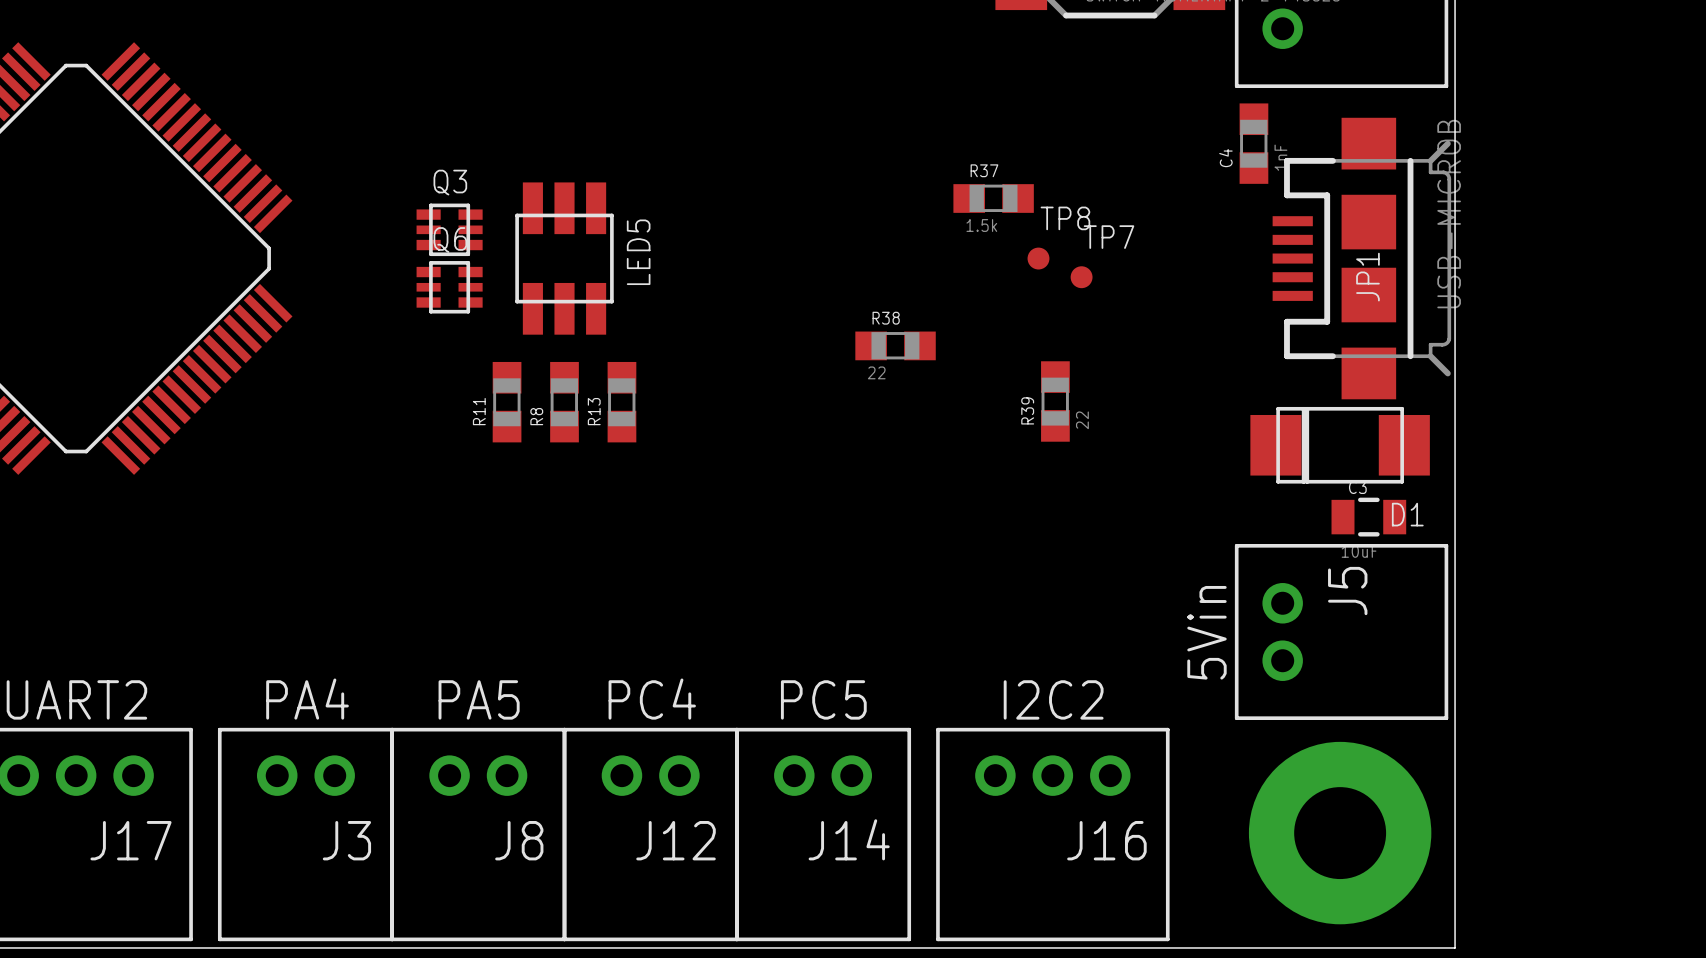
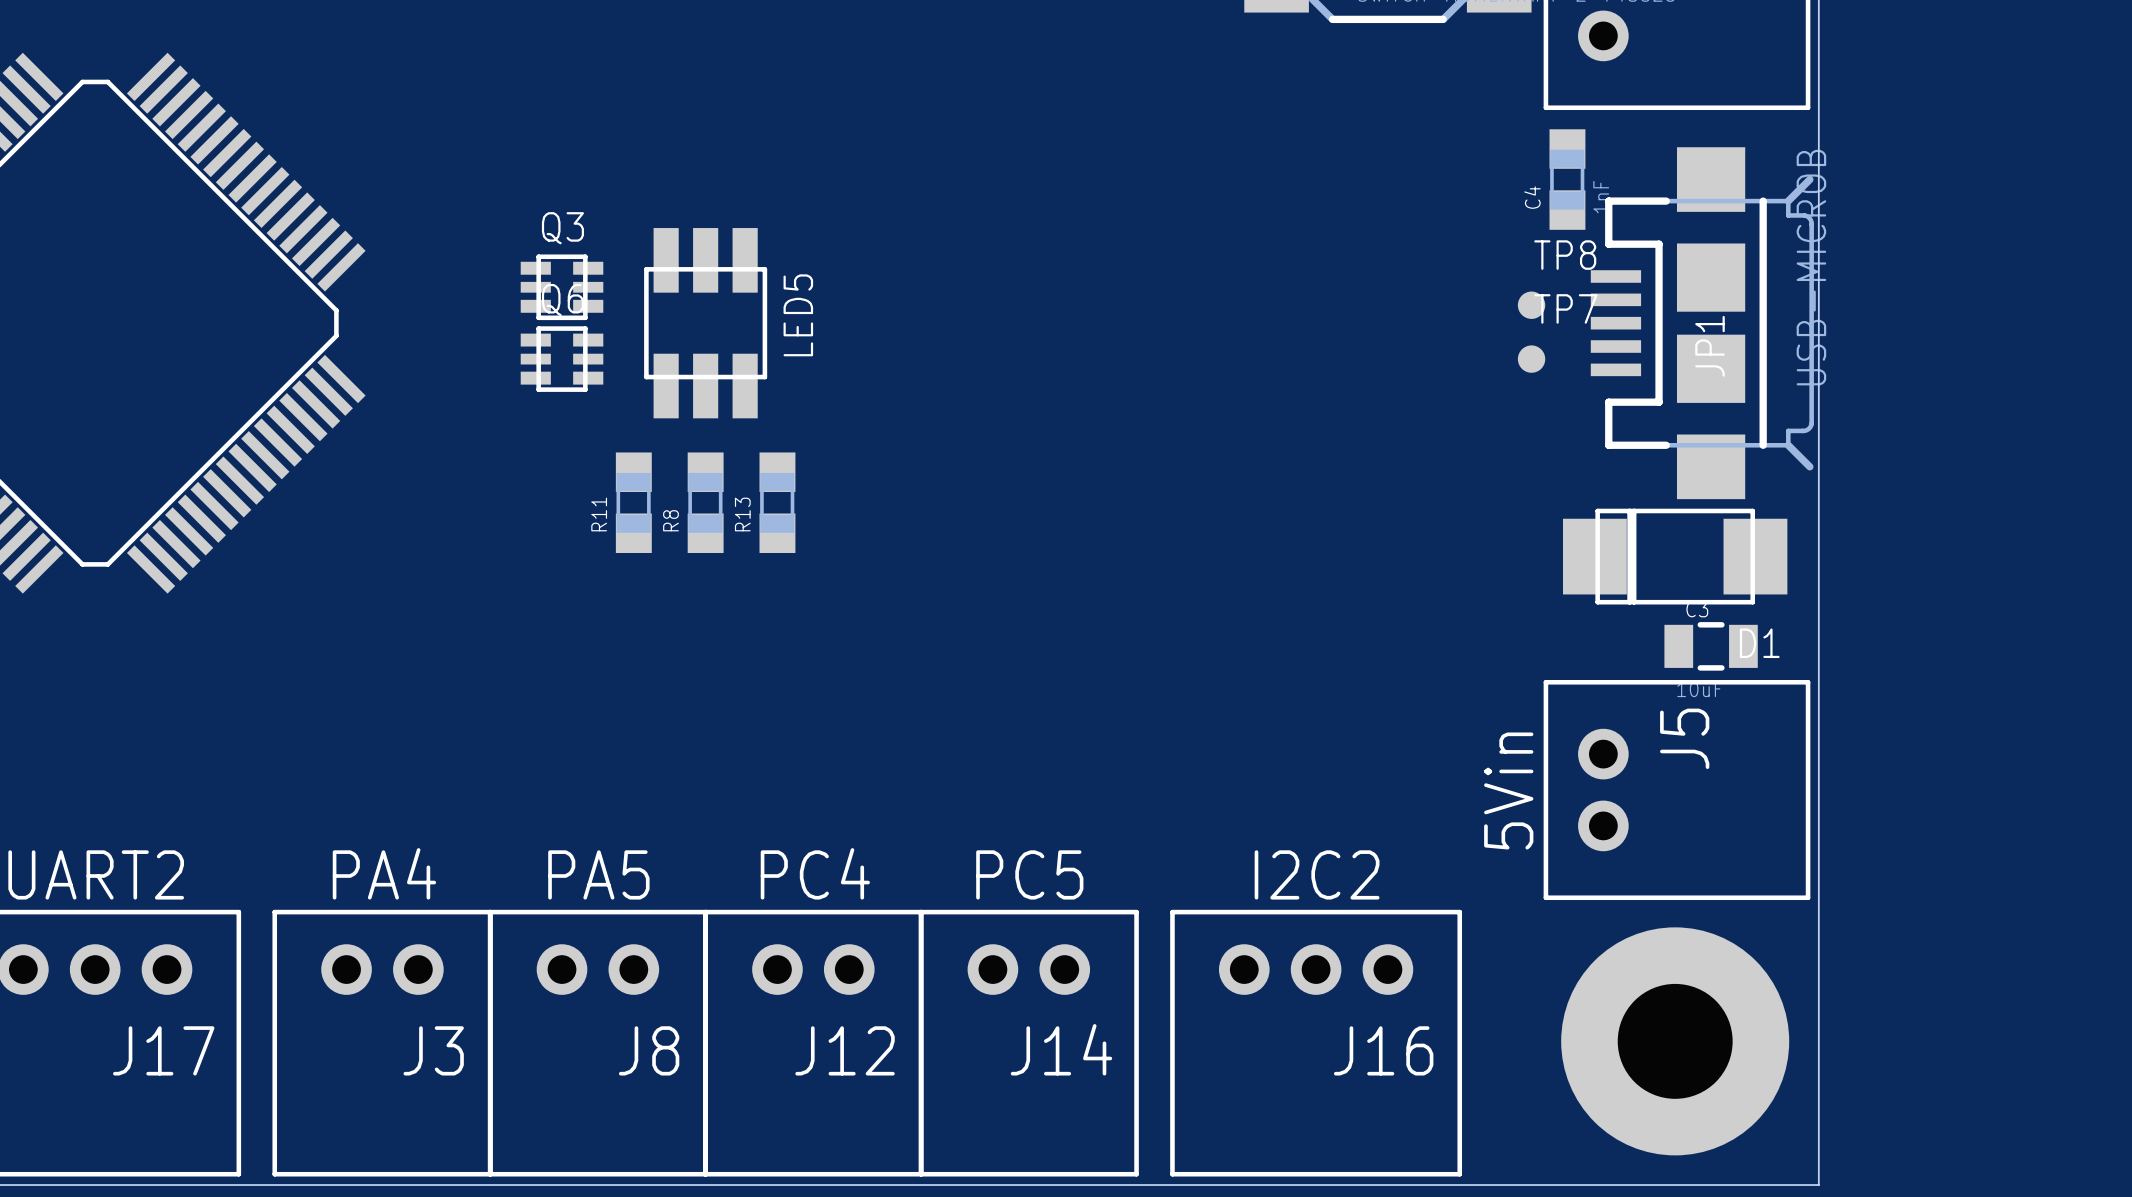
R37: 1.5k (993, 198) -> none
TP8 position: (1038, 258) -> (1531, 305)
TP7 position: (1081, 277) -> (1531, 359)
R38: 22 (895, 345) -> none
R39: 22 (1055, 401) -> none

